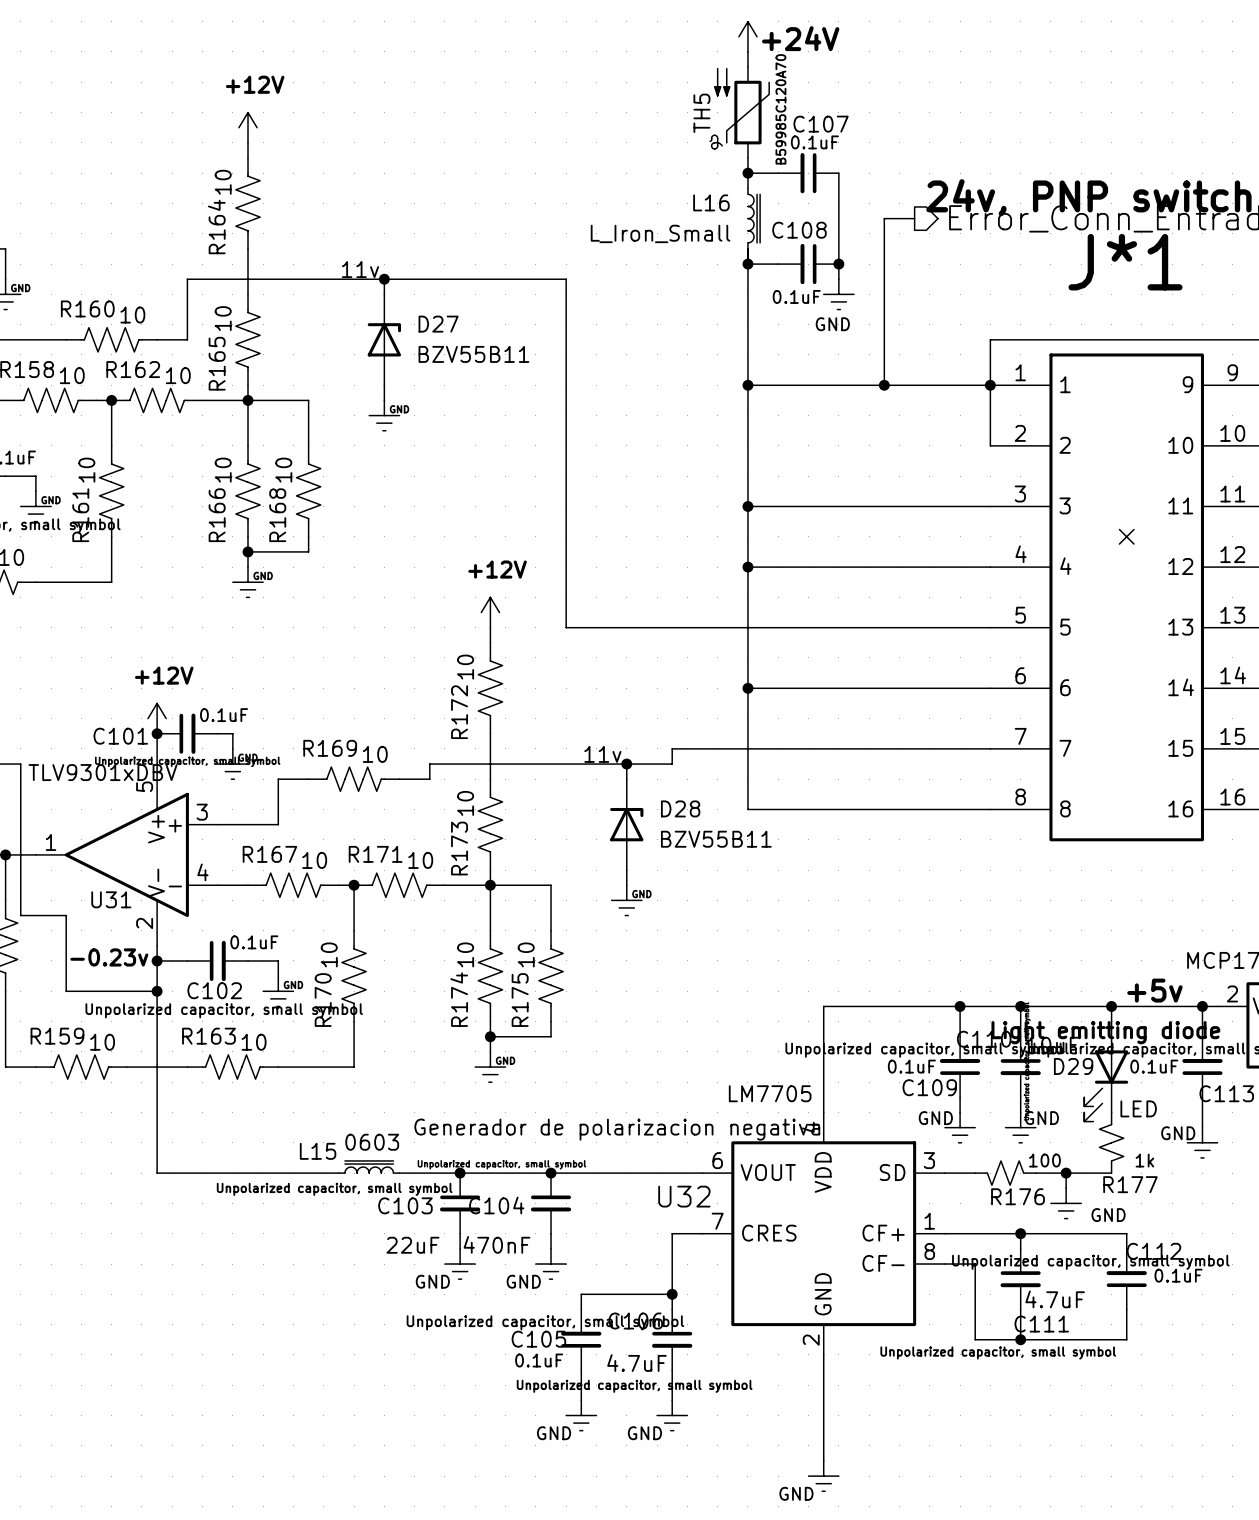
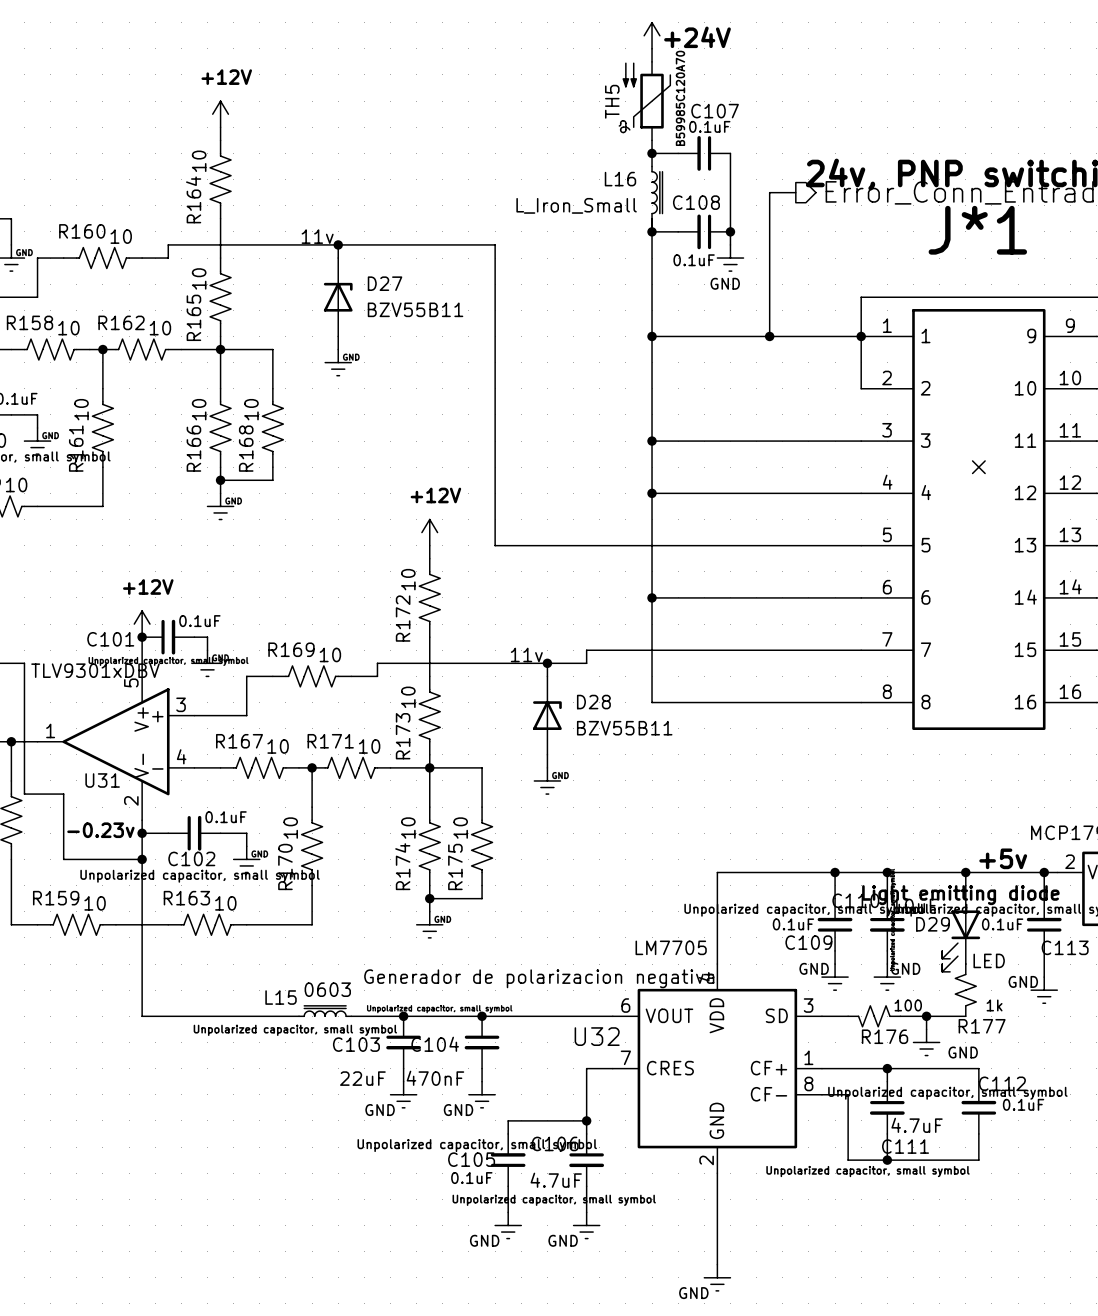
wire: (187, 294) (187, 339) (157, 339) -> (168, 258) (142, 258)
wire: (35, 339) (66, 339) -> (37, 297) (37, 258) (63, 258)
R160 position: (111, 339) -> (102, 258)

